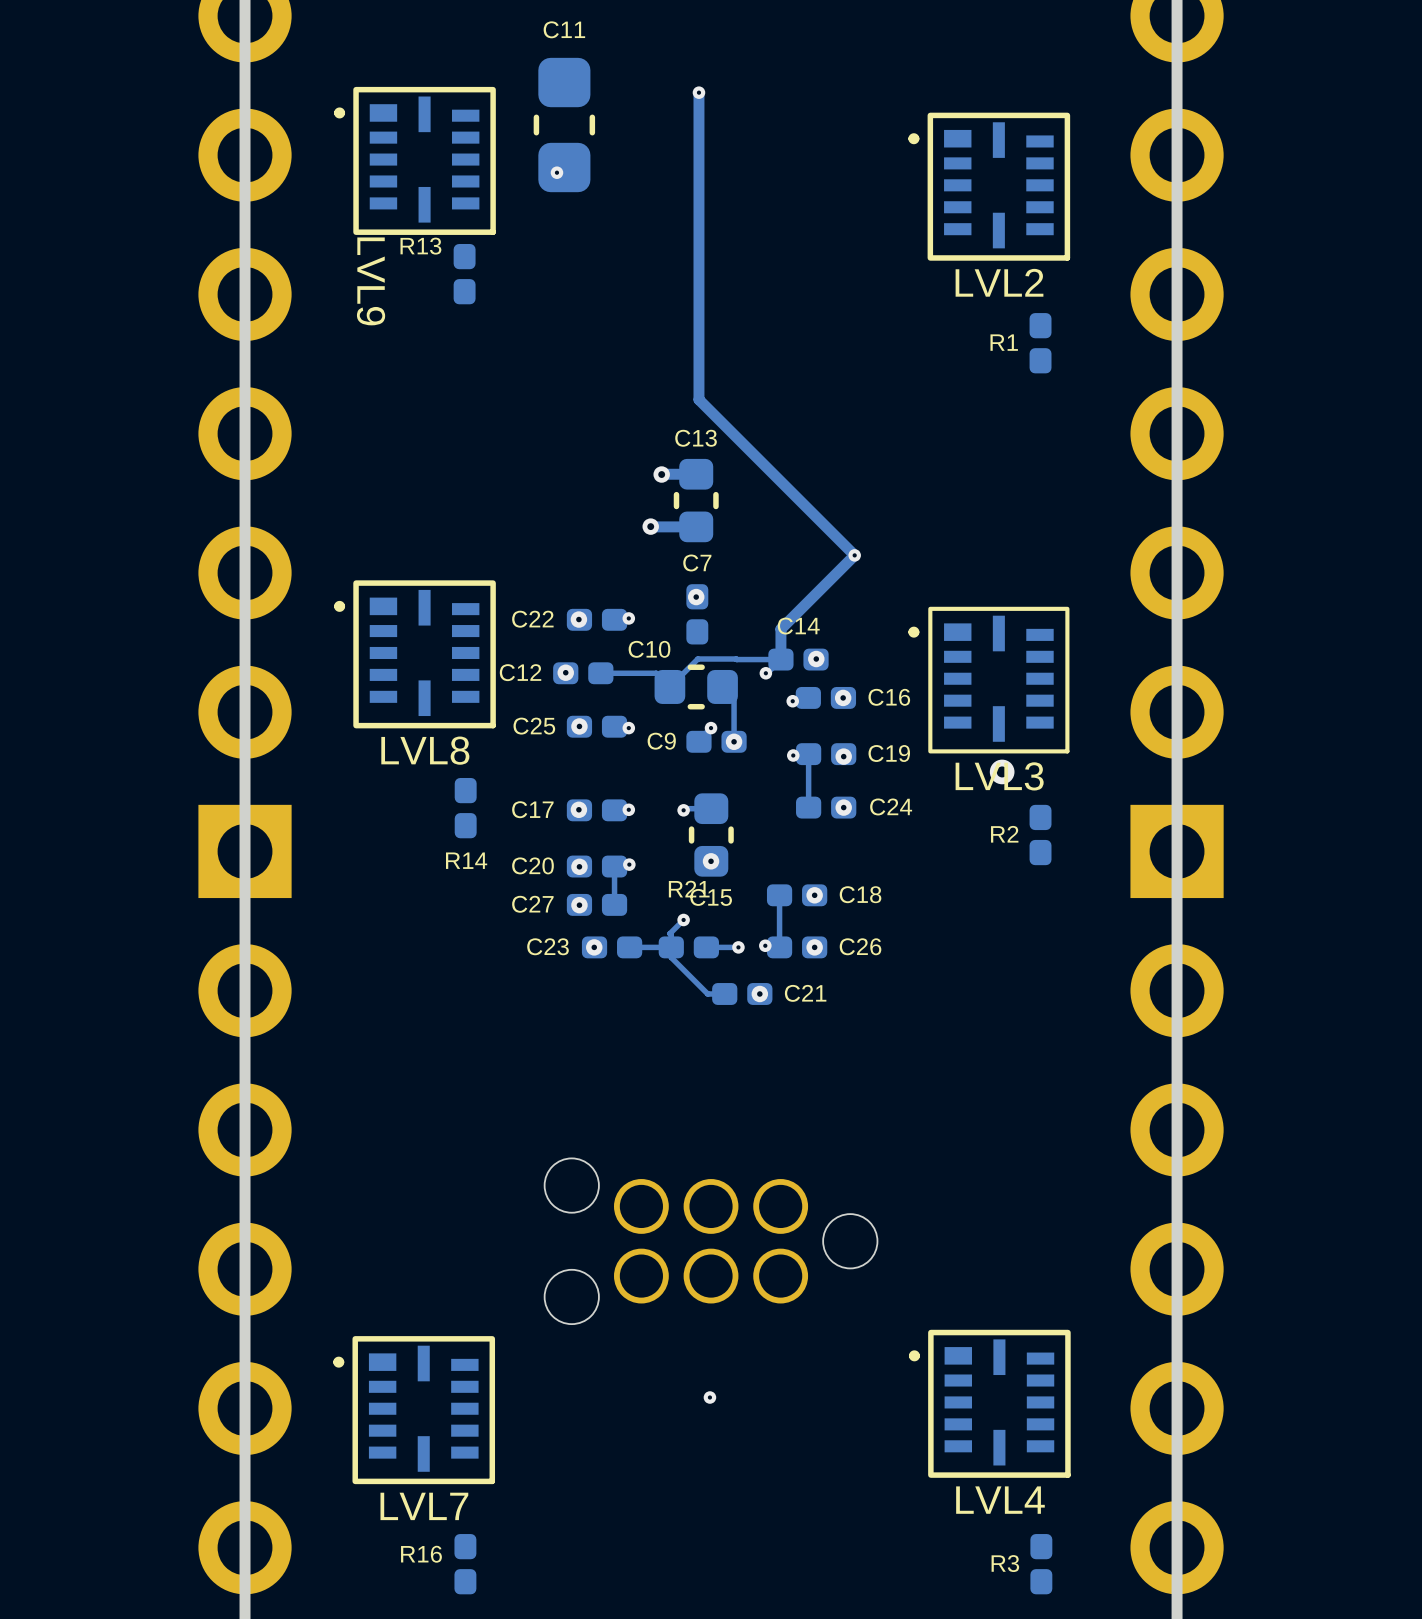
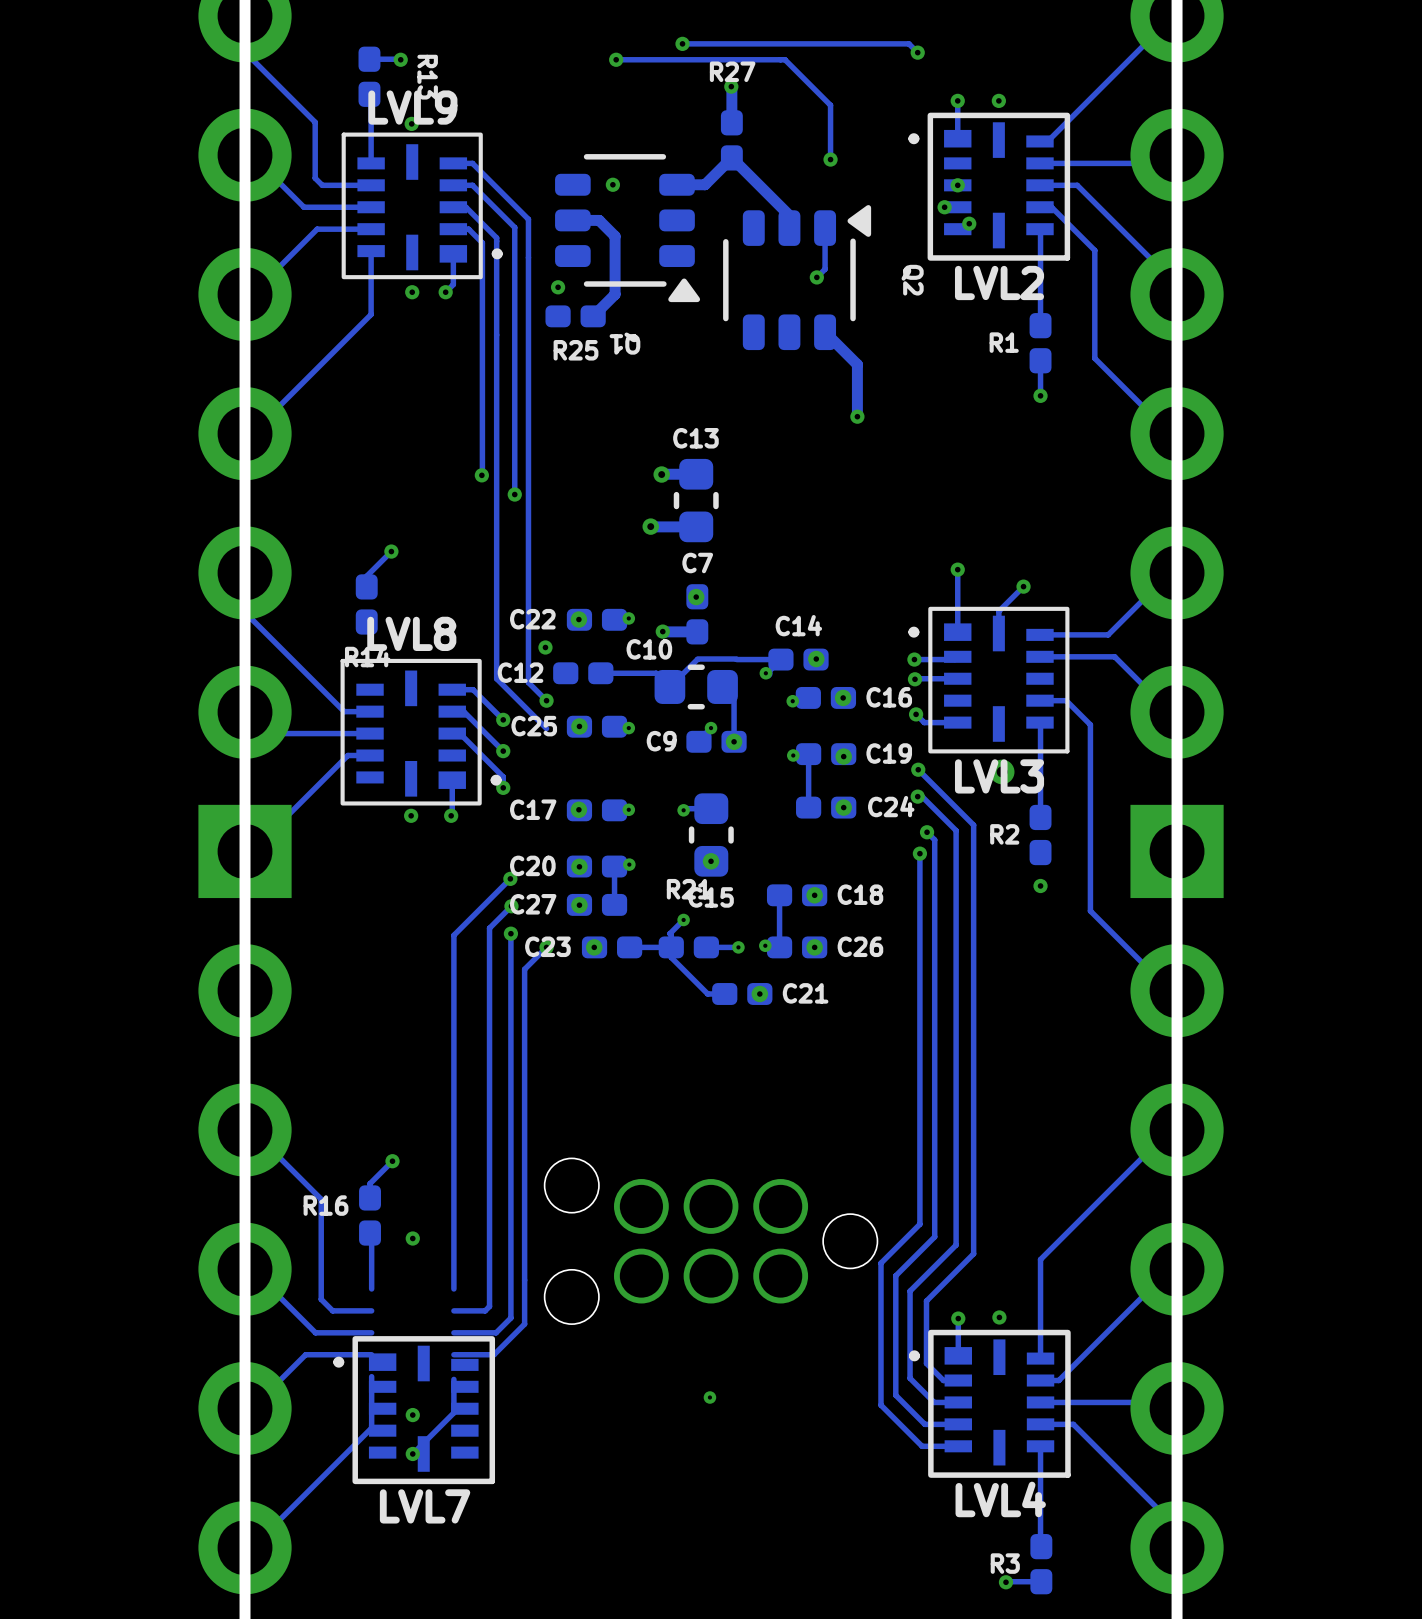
track: none -> (251, 15) (251, 59) (315, 122) (315, 178) (322, 185) (371, 185)
track: none -> (1170, 15) (1170, 18) (1047, 141) (1039, 141)
track: none -> (682, 43) (908, 43) (917, 52)
via: none -> (682, 43)
via: none -> (917, 52)
track: none -> (400, 59) (369, 59)
via: none -> (400, 59)
track: none -> (616, 59) (785, 59) (830, 105) (830, 159)
via: none -> (616, 59)
LVL9 footprint: [334, 86, 496, 235] -> [341, 132, 503, 280]
via: none -> (731, 86)
track: none -> (731, 87) (731, 122)
track: (698, 92) (698, 399) (854, 555) (780, 629) (780, 659) -> none
via: (698, 92) -> none
track: none -> (369, 94) (371, 95) (371, 163)
track: none -> (957, 100) (957, 138)
via: none -> (957, 100)
via: none -> (998, 100)
via: none -> (411, 123)
C11: (564, 125) -> none
R27: none -> (731, 140)
track: none -> (251, 155) (304, 207) (371, 207)
track: none -> (1170, 155) (1161, 163) (1039, 163)
via: none -> (830, 159)
track: none -> (453, 163) (472, 163) (528, 219) (528, 682) (546, 700)
via: (556, 172) -> none
via: none -> (612, 184)
track: none -> (677, 184) (705, 184) (731, 157) (789, 215) (789, 228)
track: none -> (453, 185) (472, 185) (514, 227) (514, 494)
via: none -> (957, 185)
track: none -> (1039, 185) (1077, 185) (1170, 278) (1170, 294)
track: none -> (453, 207) (465, 207) (496, 237) (496, 678) (546, 728)
via: none -> (944, 207)
track: none -> (1039, 207) (1051, 207) (1094, 250) (1094, 358) (1170, 433)
track: none -> (572, 220) (599, 220) (615, 236) (615, 294) (593, 316)
via: none -> (969, 223)
Q1: none -> (627, 228)
track: none -> (825, 228) (825, 269) (816, 277)
track: none -> (371, 229) (317, 229) (251, 294)
track: none -> (453, 229) (468, 229) (482, 242) (482, 474)
track: none -> (1040, 229) (1040, 325)
R13 name rotation: 0° (420, 246) -> 90° clockwise (427, 77)
R13 name position: R13 (420, 246) -> R13 (427, 77)
track: none -> (371, 251) (371, 314) (251, 433)
track: none -> (453, 253) (453, 284) (445, 292)
R13 position: (464, 274) -> (369, 76)
Q2: none -> (797, 277)
via: none -> (816, 277)
LVL9 name rotation: 0° (371, 281) -> 90° counterclockwise (412, 107)
LVL9 name position: LVL9 (371, 281) -> LVL9 (412, 107)
via: none -> (558, 287)
via: none -> (412, 292)
via: none -> (445, 292)
R25: none -> (575, 316)
track: none -> (825, 332) (857, 364) (857, 416)
track: none -> (1040, 360) (1040, 395)
via: none -> (1040, 395)
via: none -> (857, 416)
via: none -> (481, 475)
via: none -> (514, 494)
track: none -> (391, 551) (366, 576) (366, 586)
via: none -> (391, 551)
via: (854, 555) -> none
track: none -> (957, 569) (957, 632)
via: none -> (957, 569)
track: none -> (251, 572) (251, 619) (344, 711) (370, 711)
track: none -> (1170, 572) (1108, 634) (1039, 634)
LVL8 footprint: [334, 580, 496, 729] -> [340, 658, 502, 806]
track: none -> (1023, 586) (998, 611) (998, 633)
via: none -> (1023, 586)
via: none -> (662, 631)
track: none -> (697, 631) (663, 631)
via: none -> (545, 647)
track: none -> (957, 656) (955, 659) (914, 659)
track: none -> (1039, 656) (1114, 656) (1170, 712)
via: none -> (914, 659)
via: (565, 672) -> none
track: none -> (957, 678) (915, 678)
via: none -> (914, 679)
track: none -> (452, 689) (473, 689) (503, 719)
via: none -> (546, 700)
track: none -> (1039, 700) (1066, 700) (1090, 724) (1090, 911) (1170, 990)
track: none -> (452, 711) (463, 711) (503, 751)
track: none -> (251, 712) (273, 733) (370, 733)
track: none -> (916, 714) (924, 722) (957, 722)
via: none -> (916, 714)
via: none -> (503, 719)
track: none -> (1040, 723) (1040, 817)
track: none -> (452, 733) (459, 733) (503, 776) (503, 787)
LVL8 name position: LVL8 (425, 750) -> LVL8 (411, 633)
via: none -> (503, 751)
track: none -> (370, 755) (347, 755) (251, 851)
track: none -> (918, 769) (973, 825) (973, 1253) (926, 1301) (926, 1363) (943, 1380) (958, 1380)
via: none -> (918, 769)
track: none -> (452, 780) (451, 815)
via: none -> (503, 787)
track: none -> (917, 796) (922, 796) (956, 830) (956, 1245) (910, 1291) (910, 1378) (934, 1402) (958, 1402)
via: none -> (917, 796)
R14 position: (465, 808) -> (366, 604)
via: none -> (411, 815)
via: none -> (451, 815)
track: none -> (927, 832) (934, 839) (934, 1236) (895, 1275) (895, 1395) (924, 1424) (958, 1424)
via: none -> (927, 832)
track: none -> (919, 853) (919, 1224) (880, 1263) (880, 1405) (922, 1446) (958, 1446)
via: none -> (919, 853)
track: none -> (510, 878) (453, 935) (453, 1288)
via: none -> (510, 878)
via: none -> (1040, 885)
track: none -> (511, 906) (489, 928) (489, 1306) (485, 1310) (453, 1310)
via: none -> (511, 906)
track: none -> (510, 933) (510, 1318) (496, 1332) (453, 1332)
via: none -> (510, 933)
track: none -> (546, 947) (524, 969) (524, 1324) (494, 1354) (453, 1354)
via: none -> (546, 947)
track: none -> (251, 1129) (321, 1199) (321, 1299) (332, 1310) (371, 1310)
track: none -> (1170, 1129) (1040, 1259) (1040, 1358)
track: none -> (392, 1161) (370, 1183) (370, 1197)
via: none -> (392, 1161)
track: none -> (370, 1233) (371, 1234) (371, 1288)
via: none -> (412, 1238)
track: none -> (251, 1269) (315, 1332) (371, 1332)
track: none -> (1170, 1269) (1058, 1380) (1040, 1380)
via: none -> (999, 1317)
track: none -> (958, 1318) (958, 1355)
via: none -> (958, 1318)
track: none -> (371, 1354) (305, 1354) (251, 1408)
track: none -> (371, 1376) (371, 1428) (251, 1547)
track: none -> (453, 1379) (453, 1412) (412, 1453)
track: none -> (1040, 1402) (1164, 1402) (1170, 1408)
via: none -> (412, 1415)
track: none -> (1040, 1424) (1073, 1424) (1170, 1521) (1170, 1547)
track: none -> (1040, 1446) (1041, 1546)
via: none -> (412, 1453)
R16 position: (465, 1564) -> (370, 1215)
track: none -> (1041, 1581) (1006, 1581)
via: none -> (1005, 1582)

